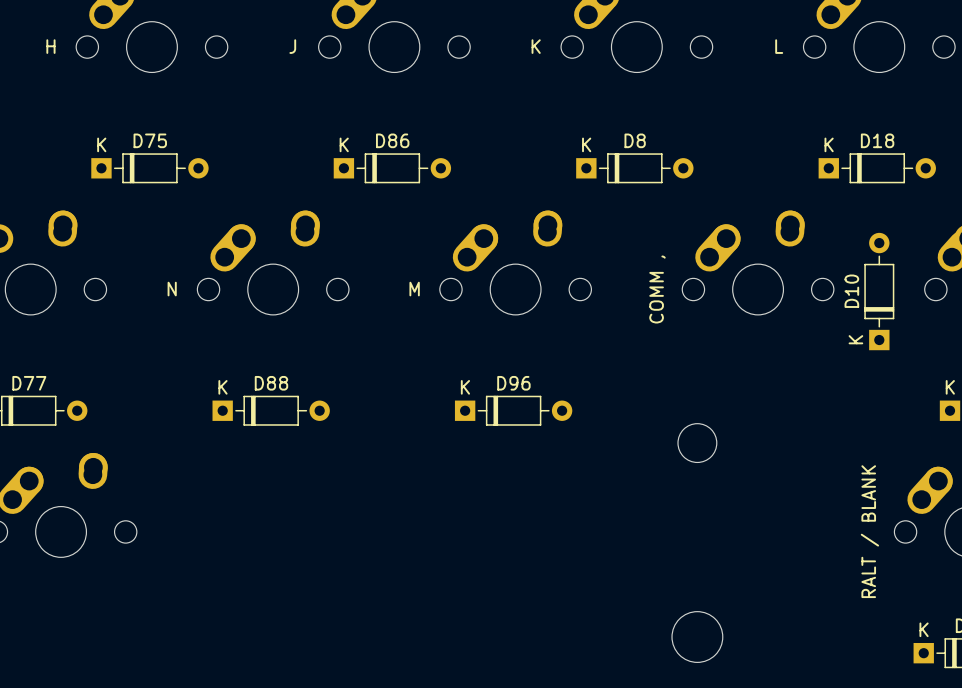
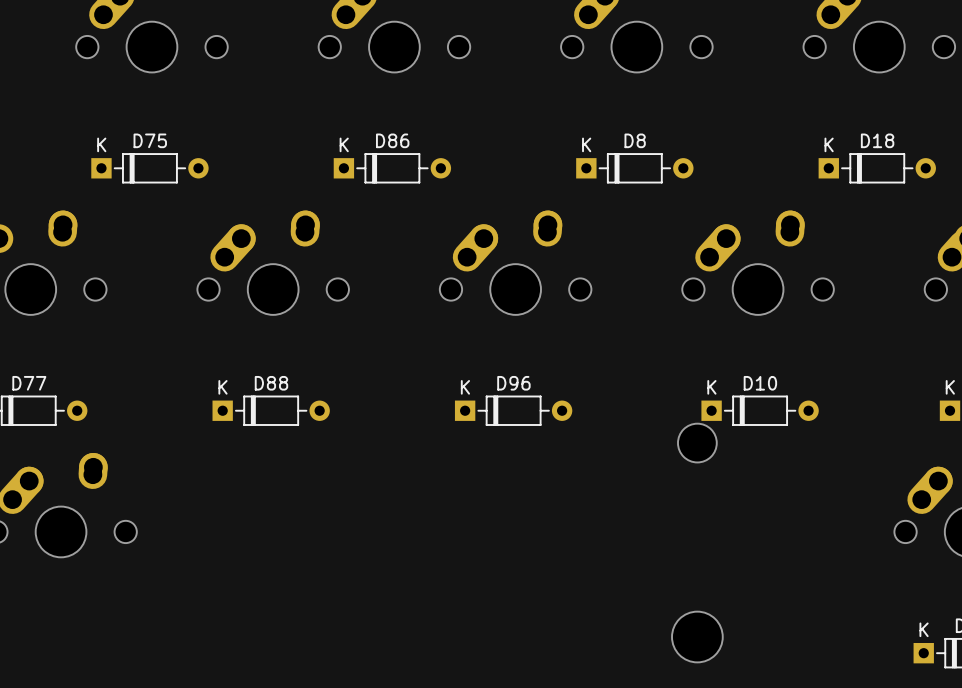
text: H (50, 46) -> none
text: J (292, 46) -> none
text: K (536, 46) -> none
text: L (779, 46) -> none
text: N (172, 289) -> none
text: M (414, 289) -> none
text: COMM , (657, 289) -> none
D10 rotation: 0° (879, 291) -> 90° clockwise (760, 410)
D10 position: (879, 291) -> (760, 410)
text: RALT / BLANK (869, 531) -> none

